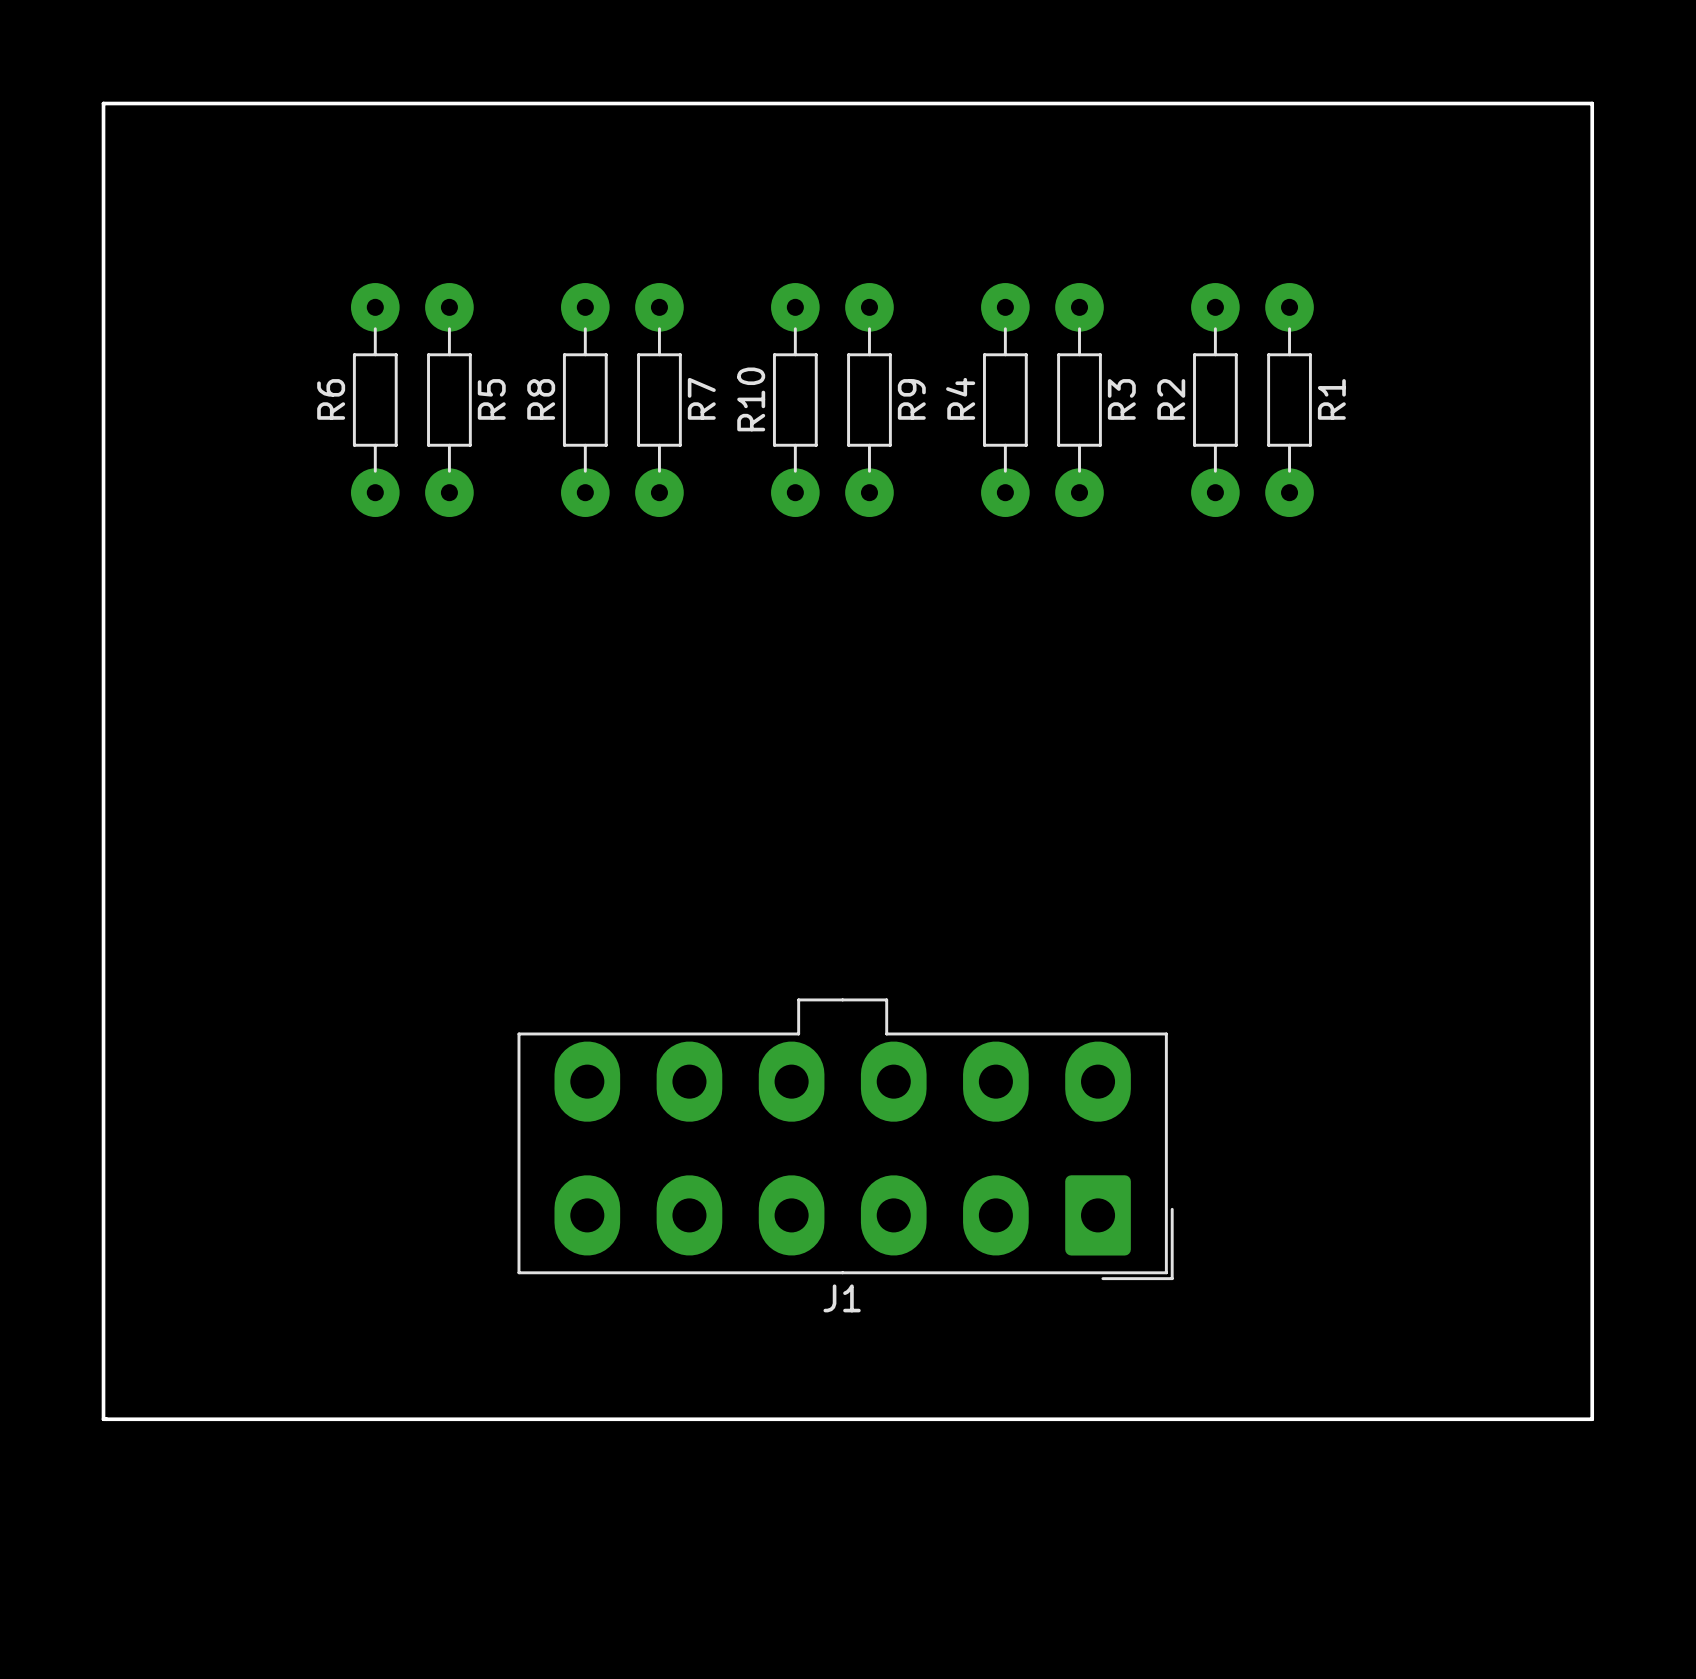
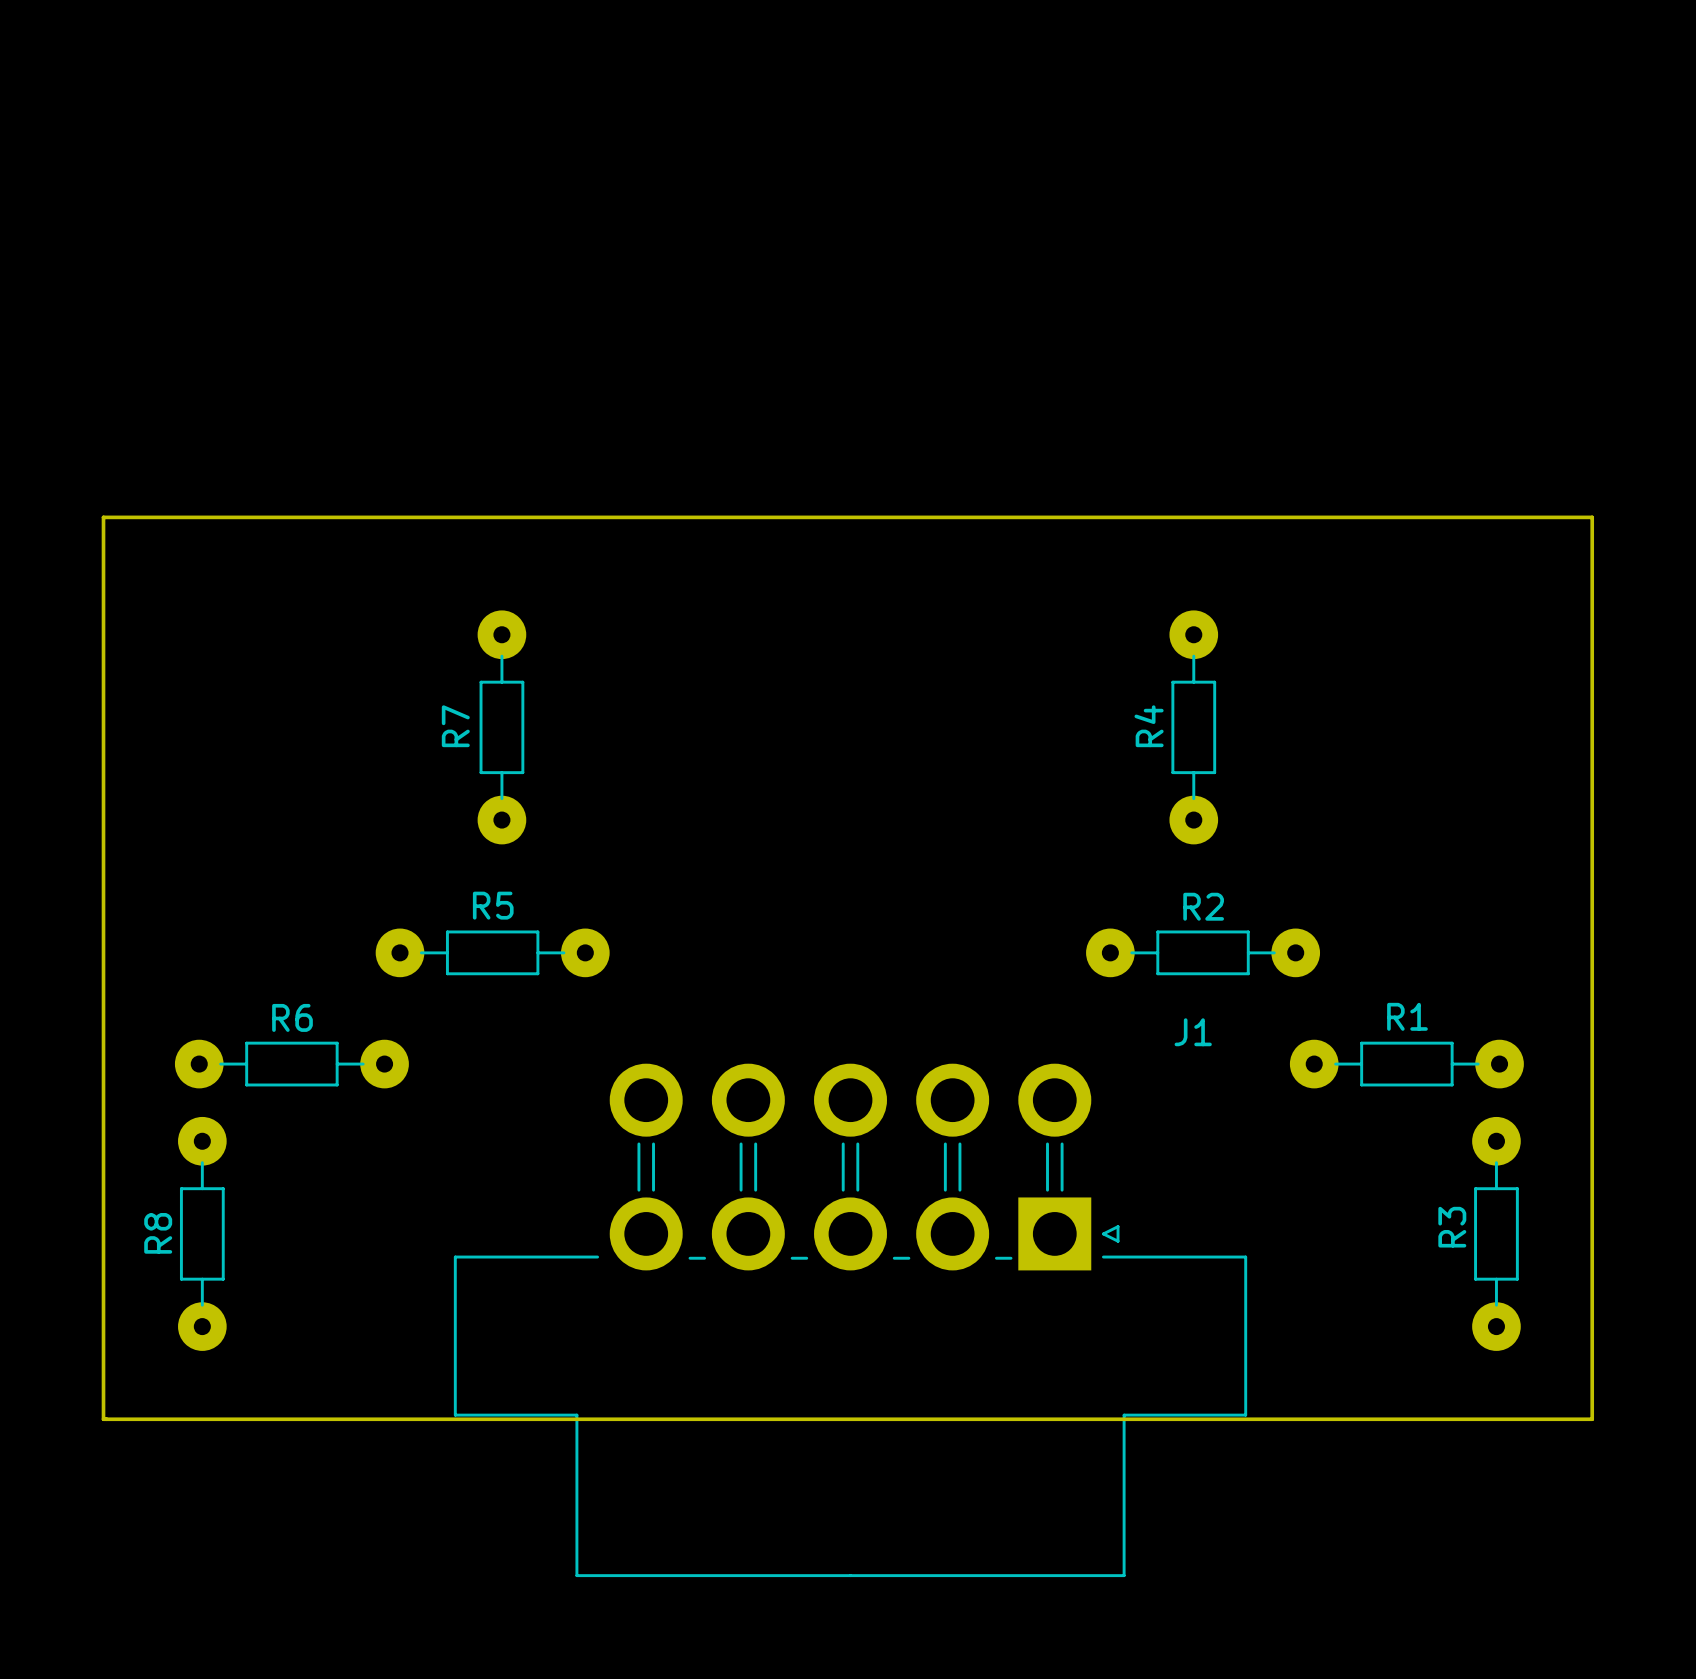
R7 name position: R7 (701, 398) -> R7 (455, 726)
R5 name position: R5 (491, 399) -> R5 (493, 905)
R3 name position: R3 (1121, 399) -> R3 (1452, 1227)
R1 name position: R1 (1331, 399) -> R1 (1407, 1016)
R6 rotation: 0° (375, 400) -> 90° clockwise (291, 1064)
R6 position: (375, 400) -> (291, 1064)
R5 rotation: 0° (449, 400) -> 90° clockwise (492, 952)
R5 position: (449, 400) -> (492, 952)
R8 position: (585, 400) -> (202, 1233)
R7 position: (659, 400) -> (501, 727)
R10: (795, 400) -> none
R9: (869, 400) -> none
R4 position: (1005, 400) -> (1193, 727)
R3 position: (1079, 400) -> (1496, 1233)
R2 rotation: 0° (1215, 400) -> 90° clockwise (1203, 952)
R2 position: (1215, 400) -> (1203, 952)
R1 rotation: 0° (1289, 400) -> 90° clockwise (1406, 1064)
R1 position: (1289, 400) -> (1406, 1064)
board edge: (103, 517) (103, 103) (1592, 103) (1592, 517) -> (103, 517) (1592, 517)
J1 footprint: [517, 998, 1174, 1281] -> [453, 1063, 1248, 1578]
J1 name position: J1 (842, 1298) -> J1 (1193, 1032)

